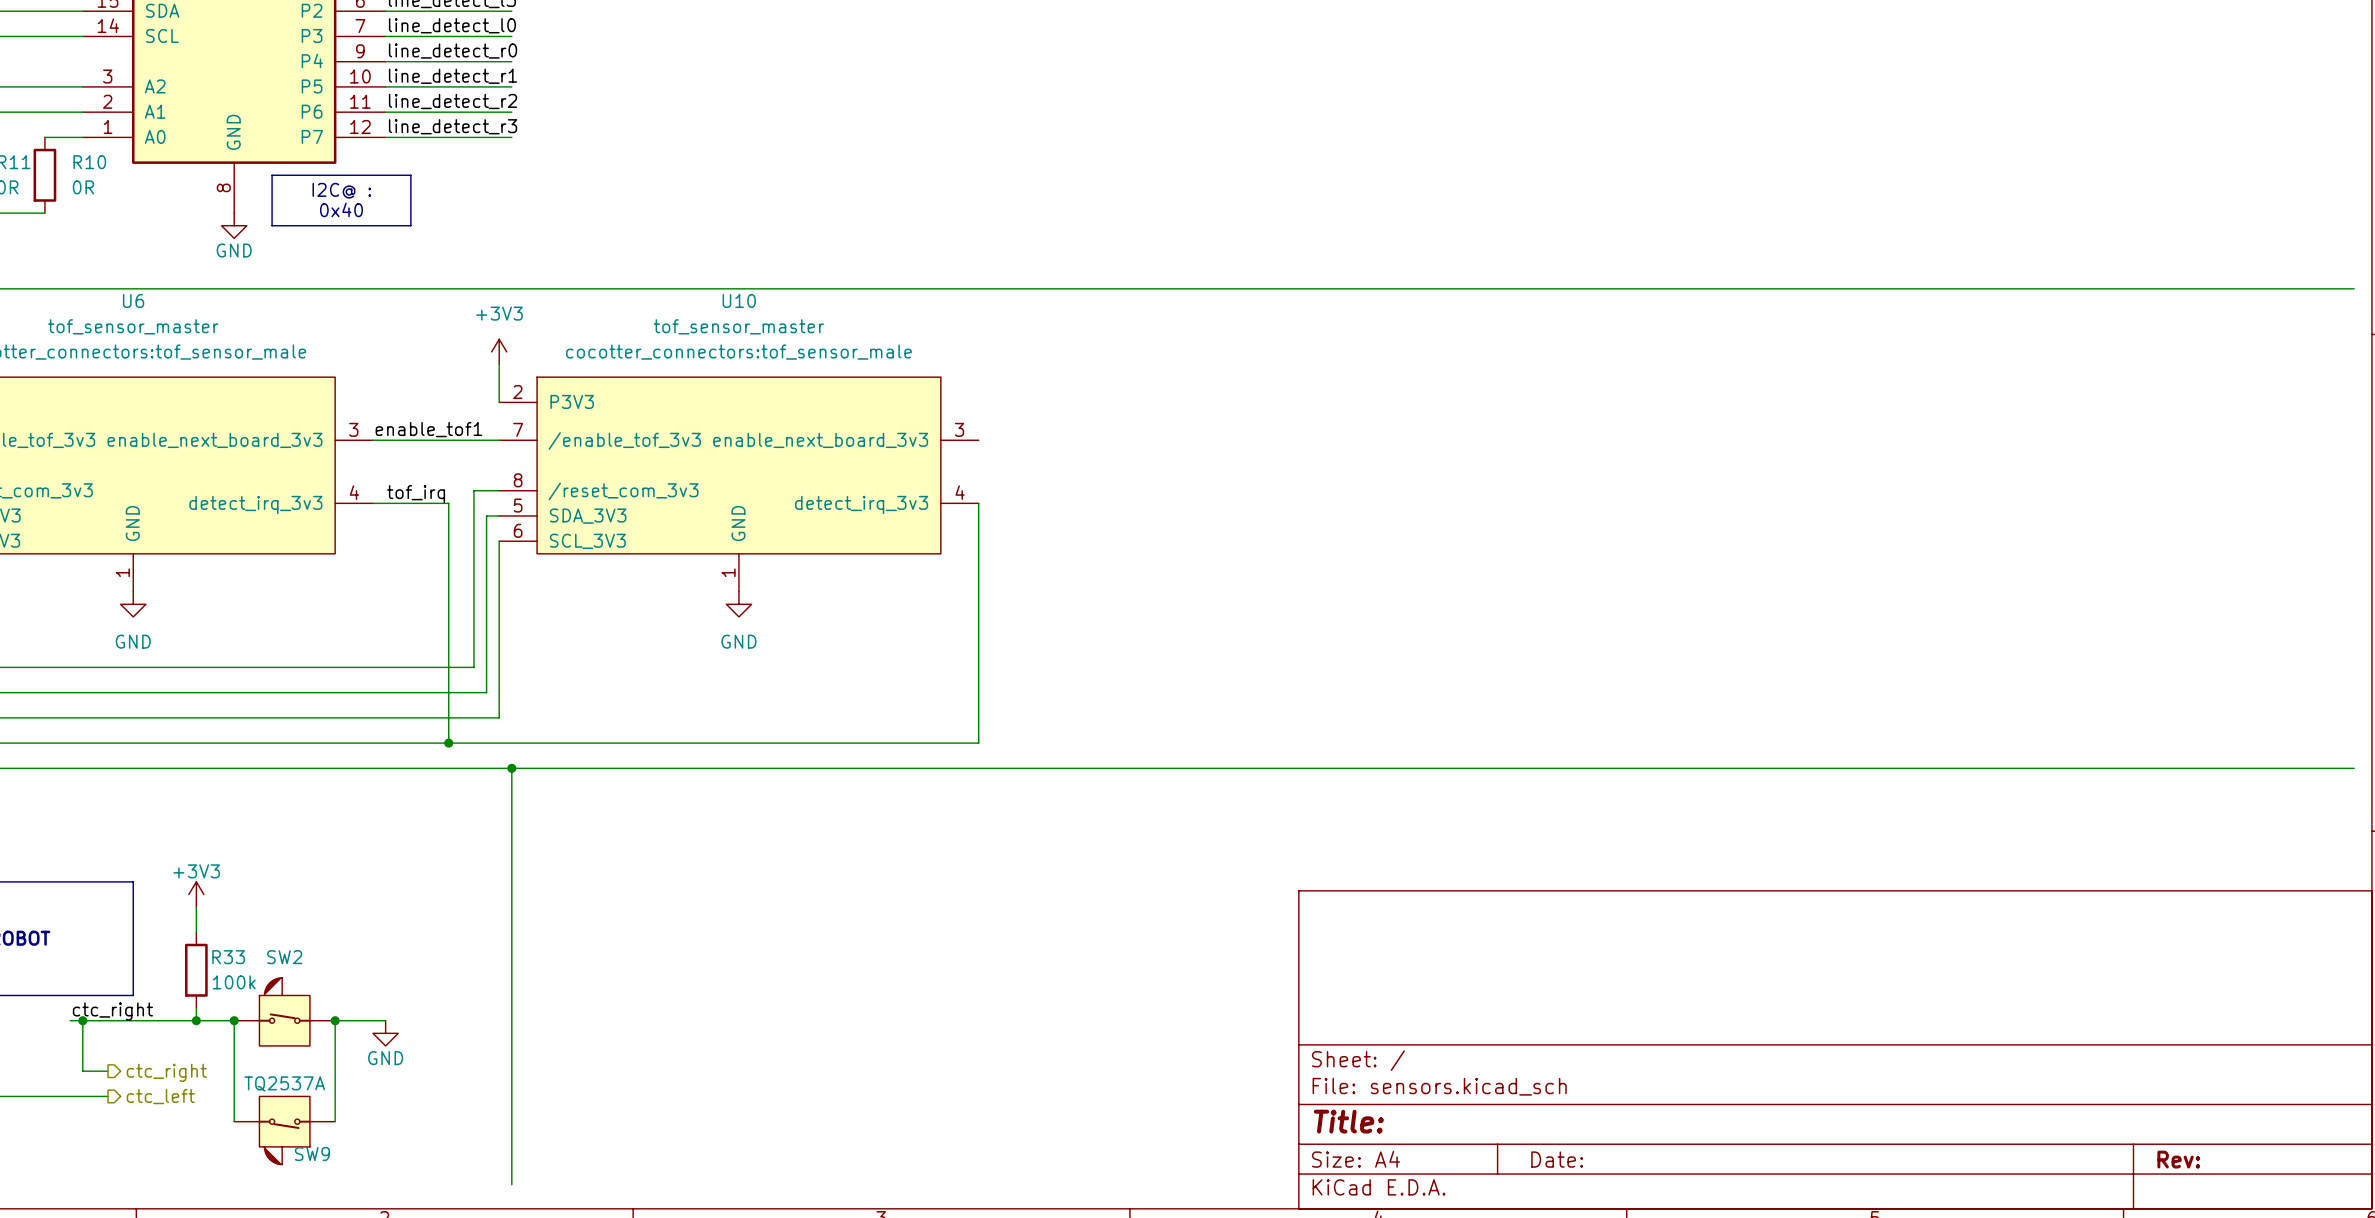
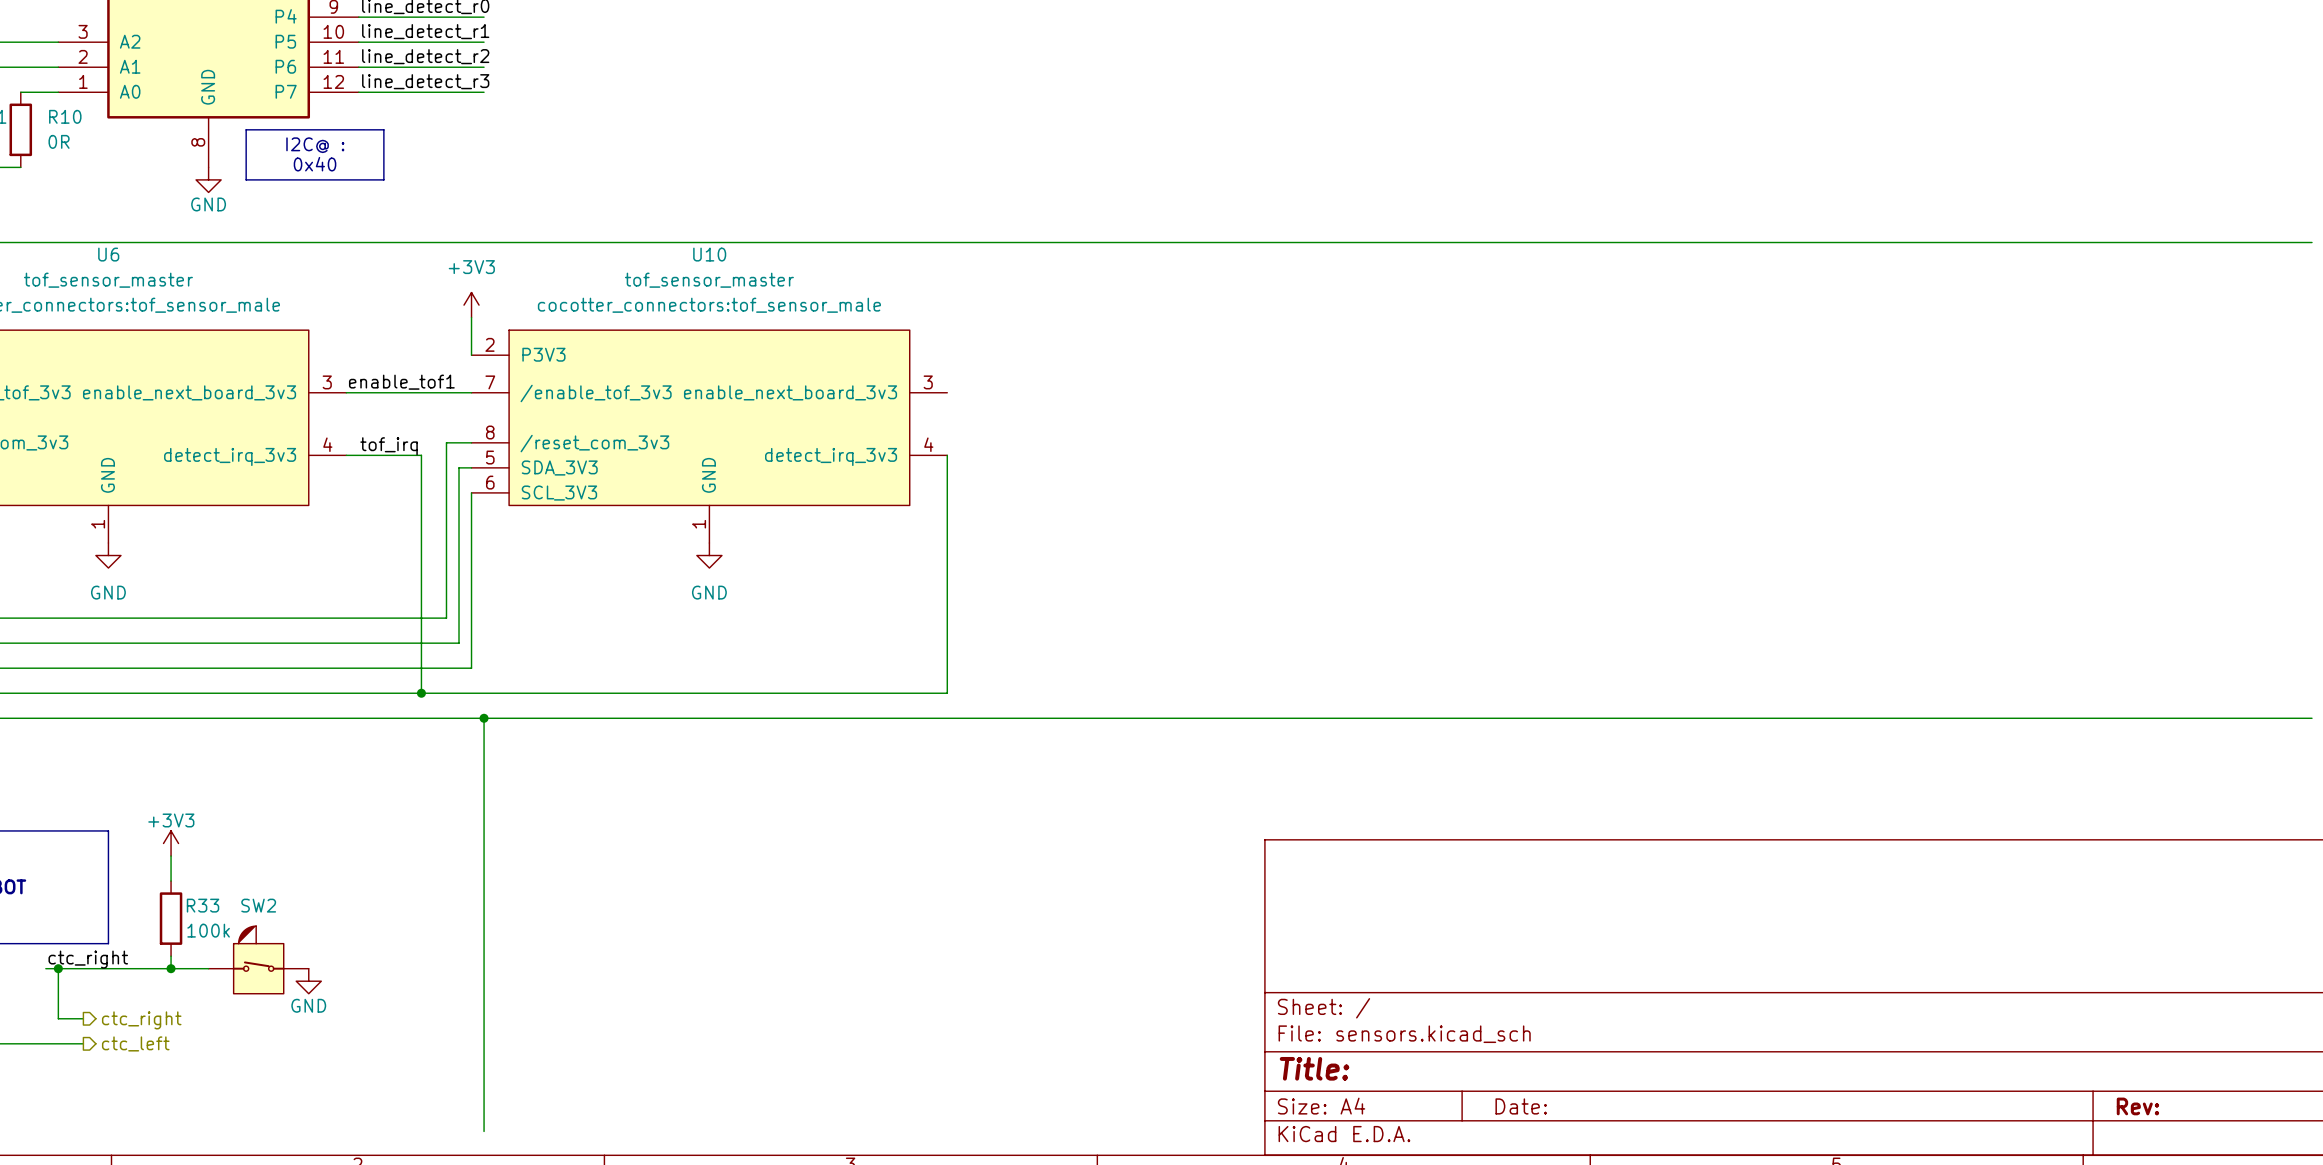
wire: (234, 1020) (234, 1121) -> none
junction: (234, 1020) -> none
junction: (335, 1020) -> none
wire: (385, 1020) (335, 1020) (335, 1121) -> none
power symbol position: GND (385, 1033) -> GND (308, 981)
SW9: TQ2537A (284, 1130) -> none

